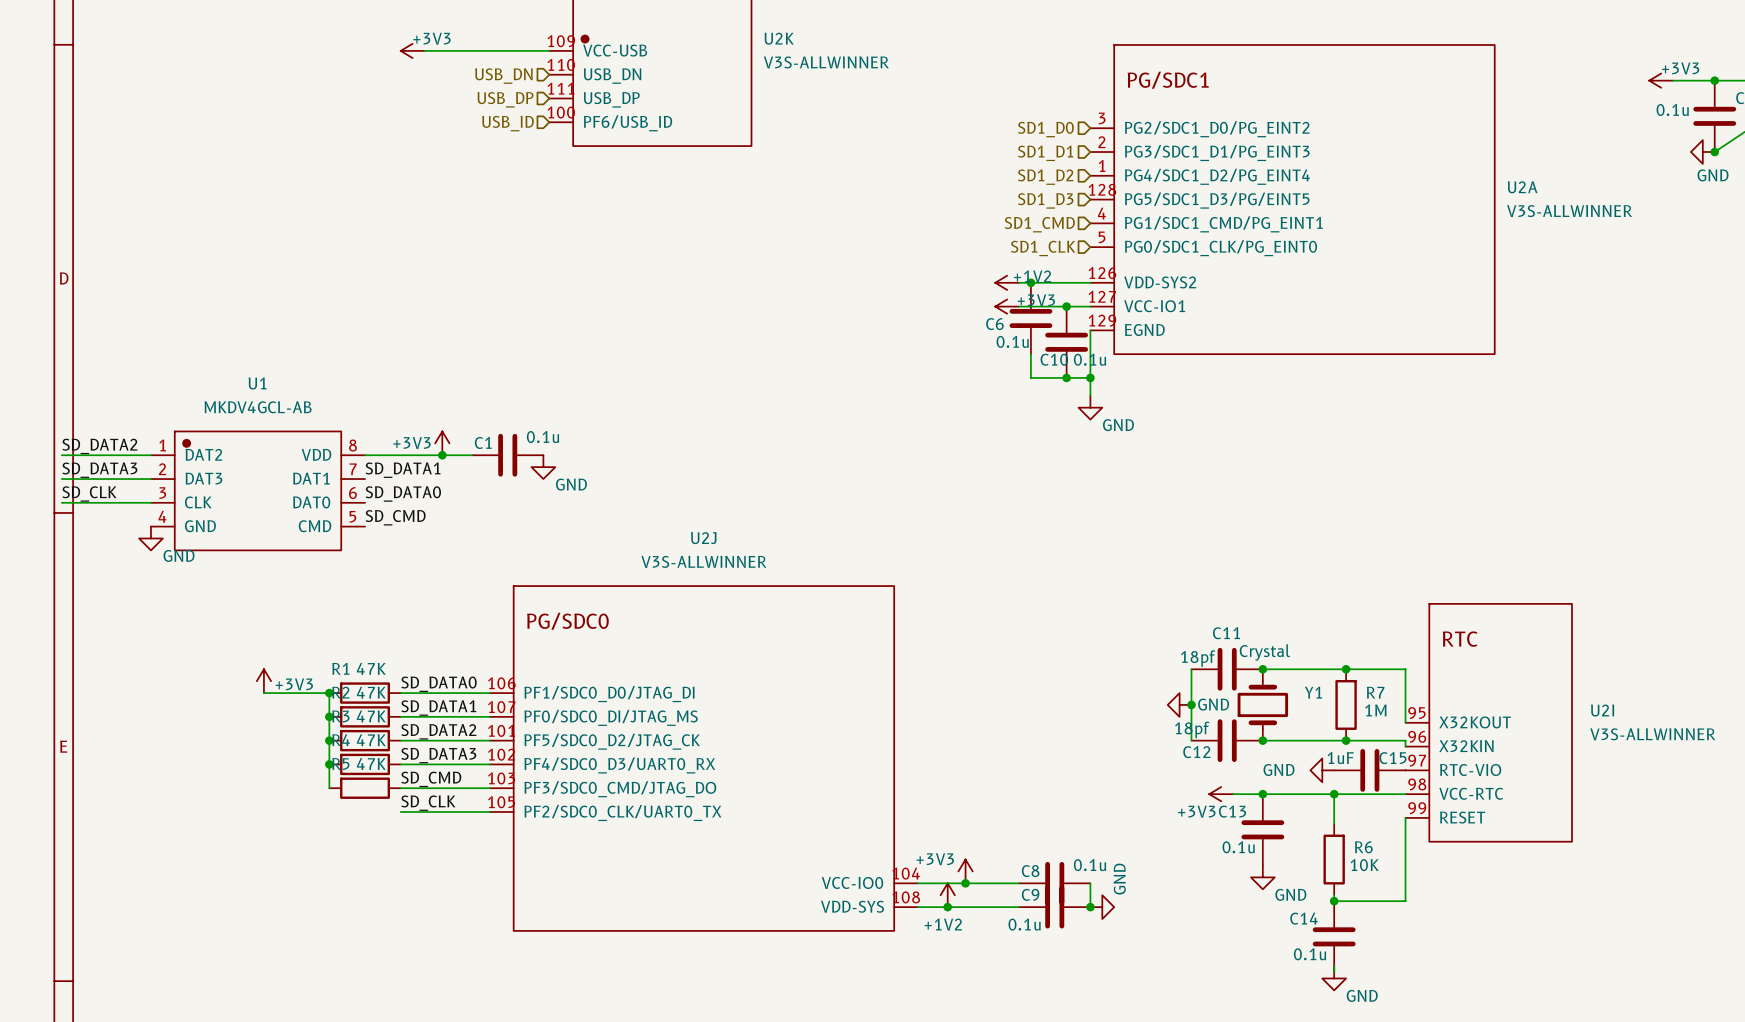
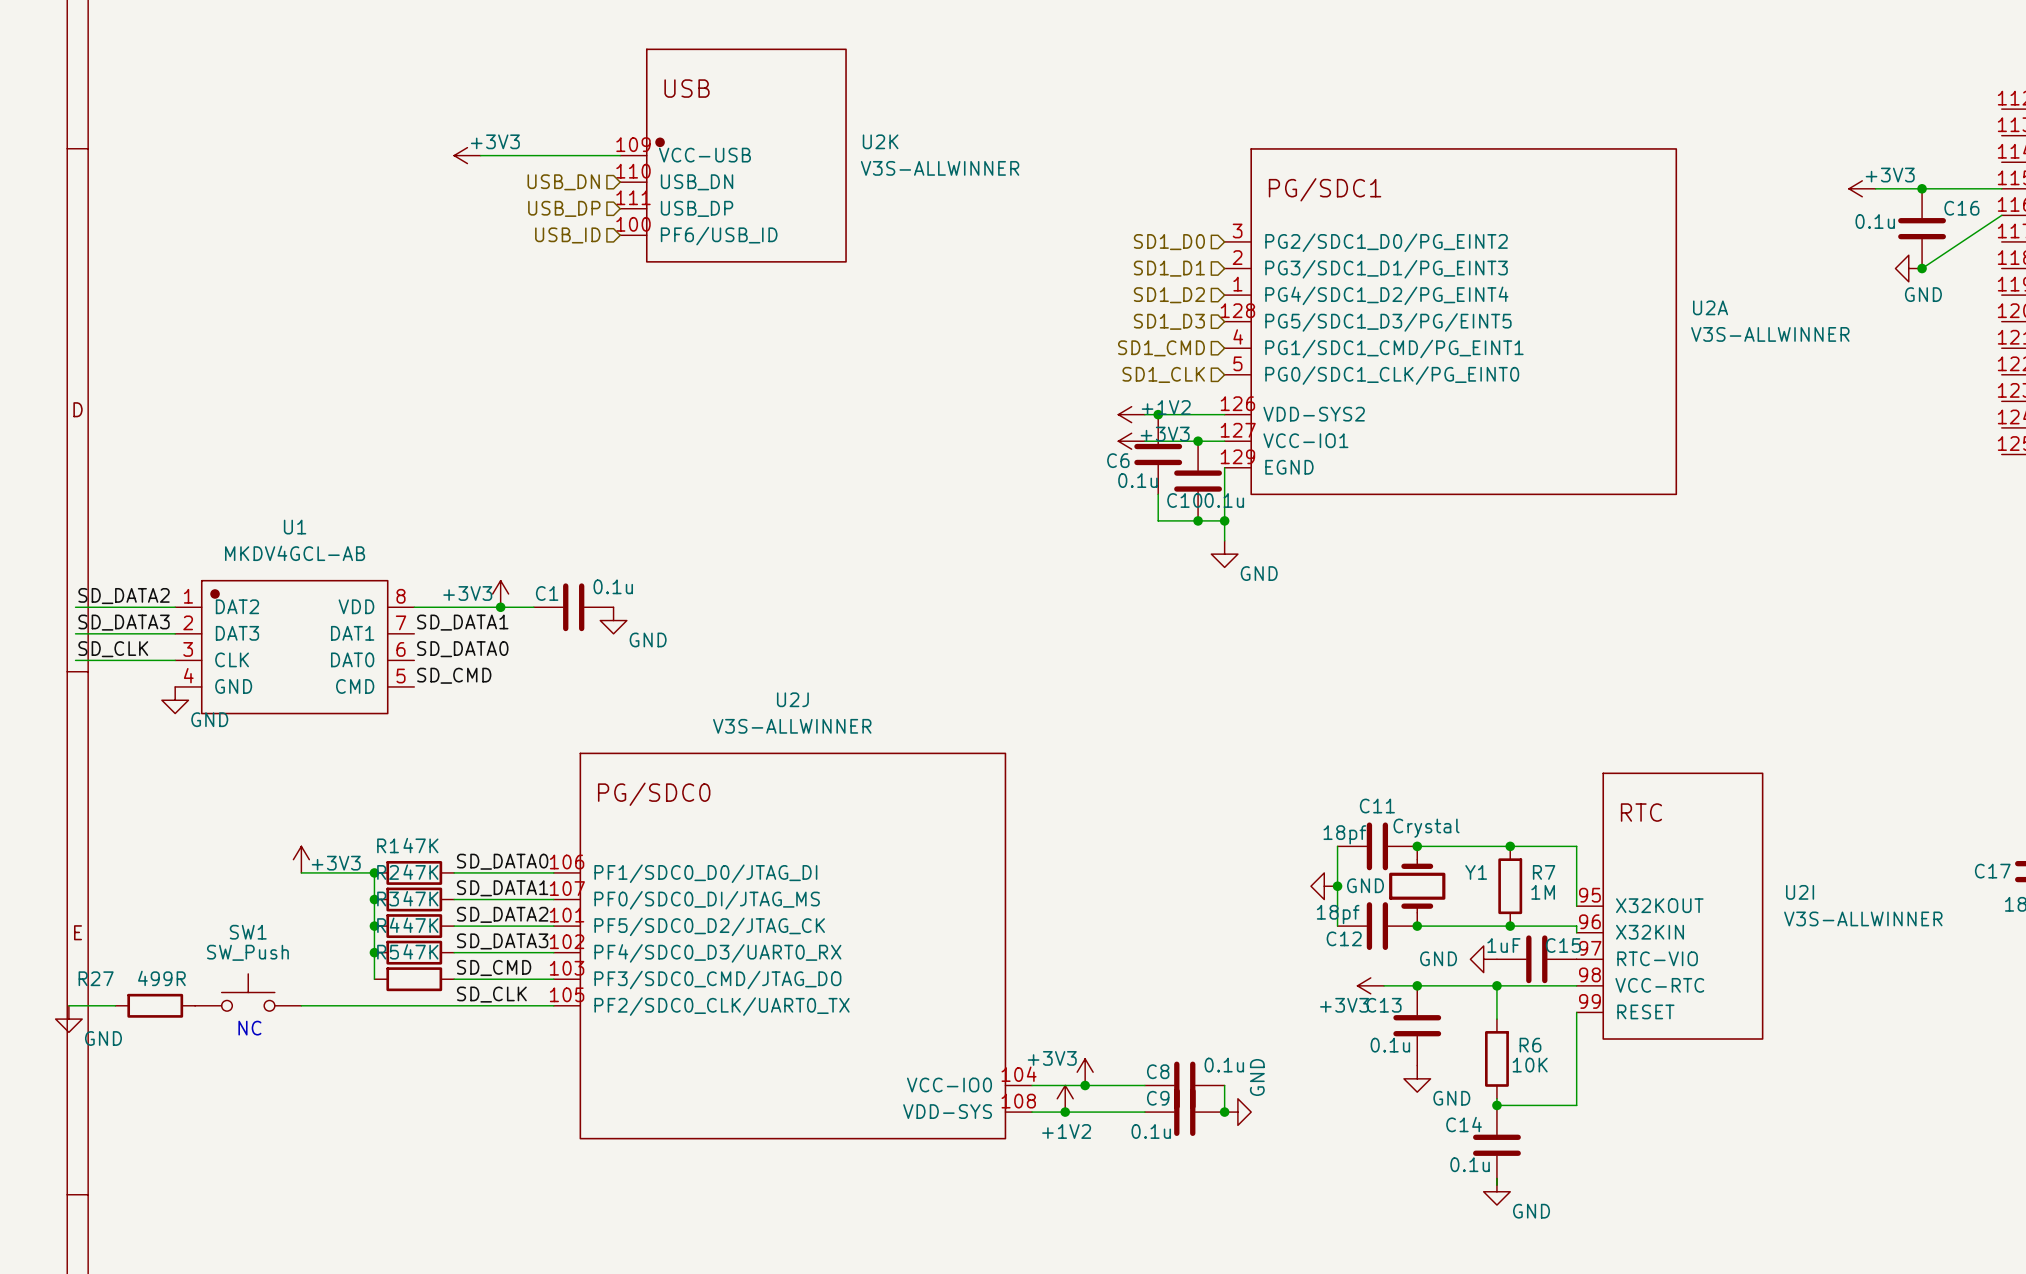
SW1: none -> SW_Push (248, 992)
wire: none -> (68, 1005) (115, 1005)
R27: none -> 499R (155, 1005)
wire: none -> (301, 1005) (454, 1005)
power symbol: none -> GND (68, 1019)
text: none -> NC (249, 1028)

